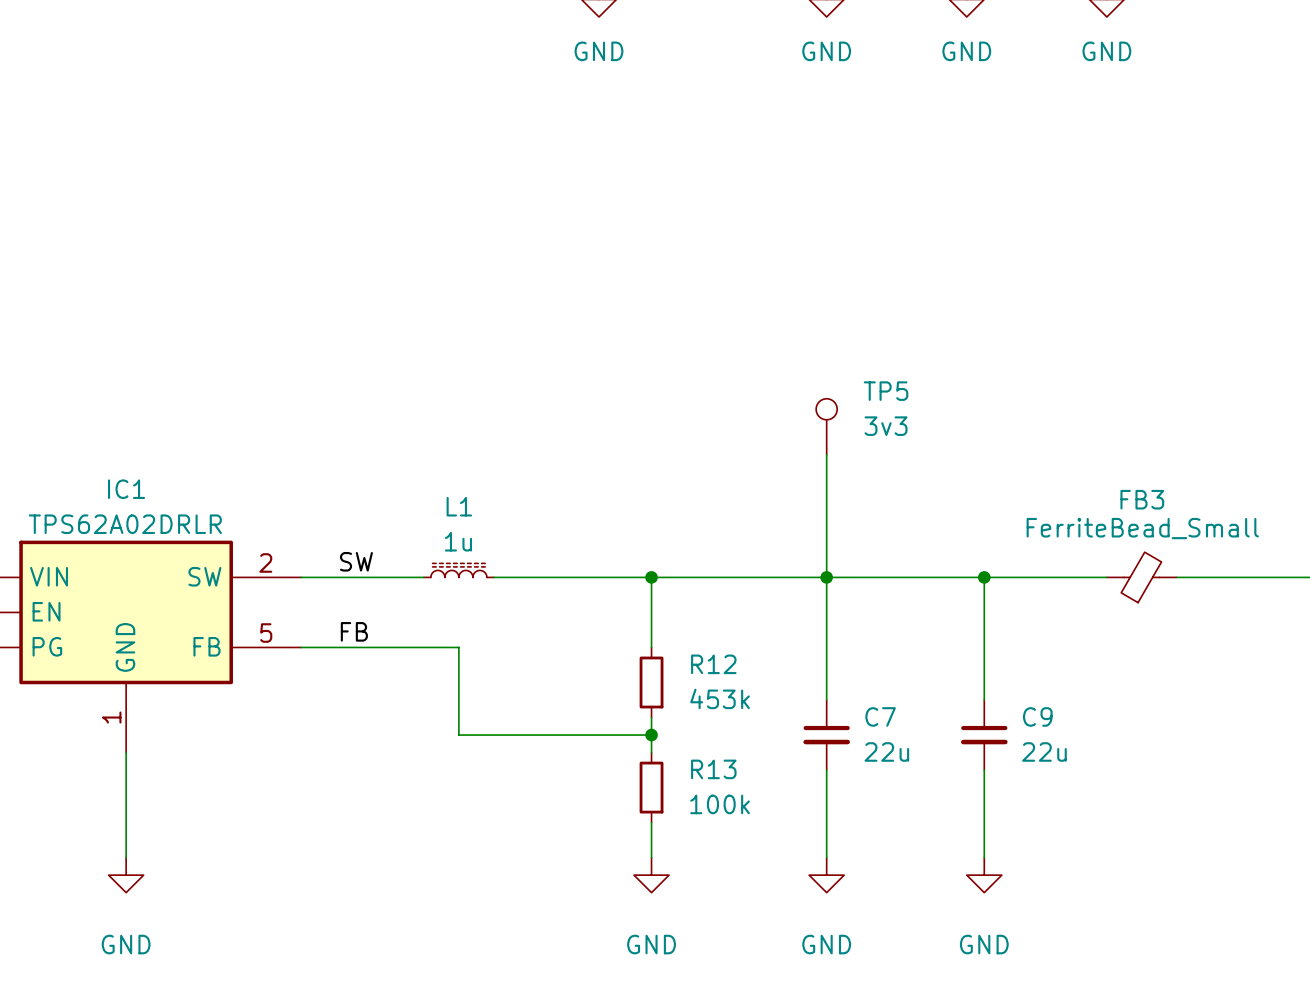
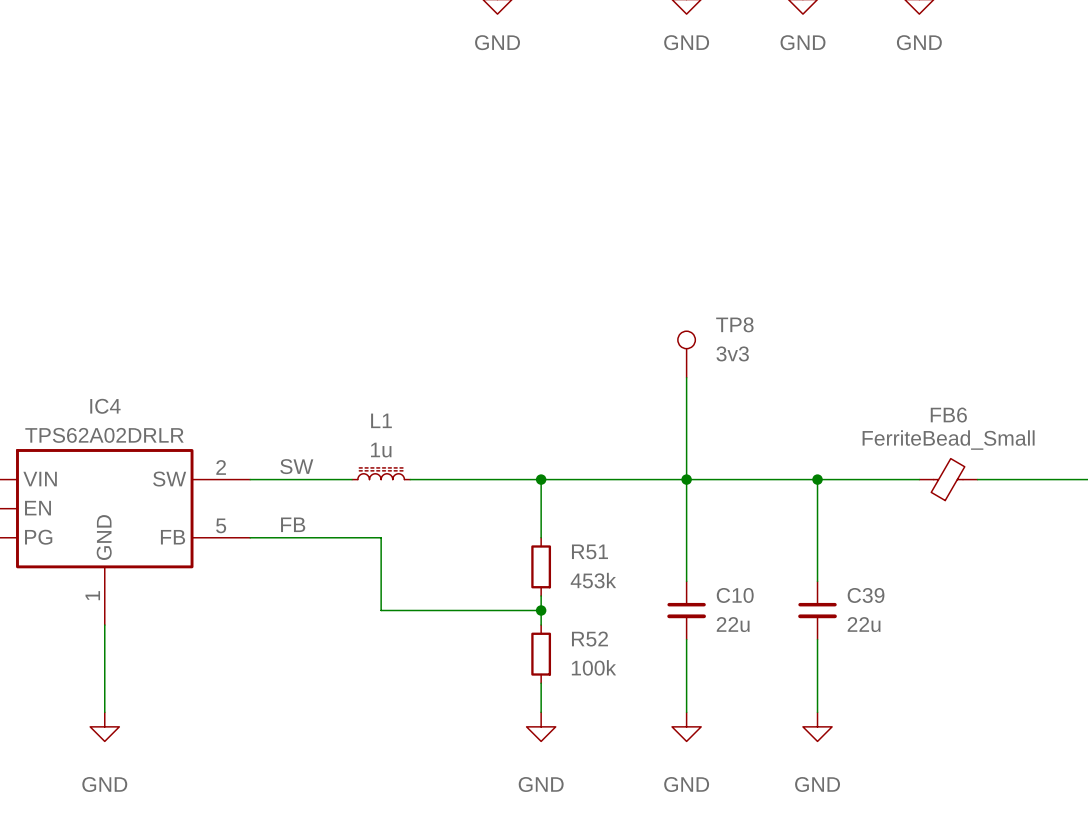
TP5 name: TP5 (886, 391) -> TP8 (734, 324)
IC1 name: IC1 (126, 489) -> IC4 (105, 406)
FB3 name: FB3 (1142, 499) -> FB6 (948, 415)
R12 name: R12 (713, 664) -> R51 (589, 551)
C7 name: C7 (880, 716) -> C10 (735, 595)
C9 name: C9 (1037, 716) -> C39 (866, 595)
R13 name: R13 (713, 769) -> R52 (589, 639)

